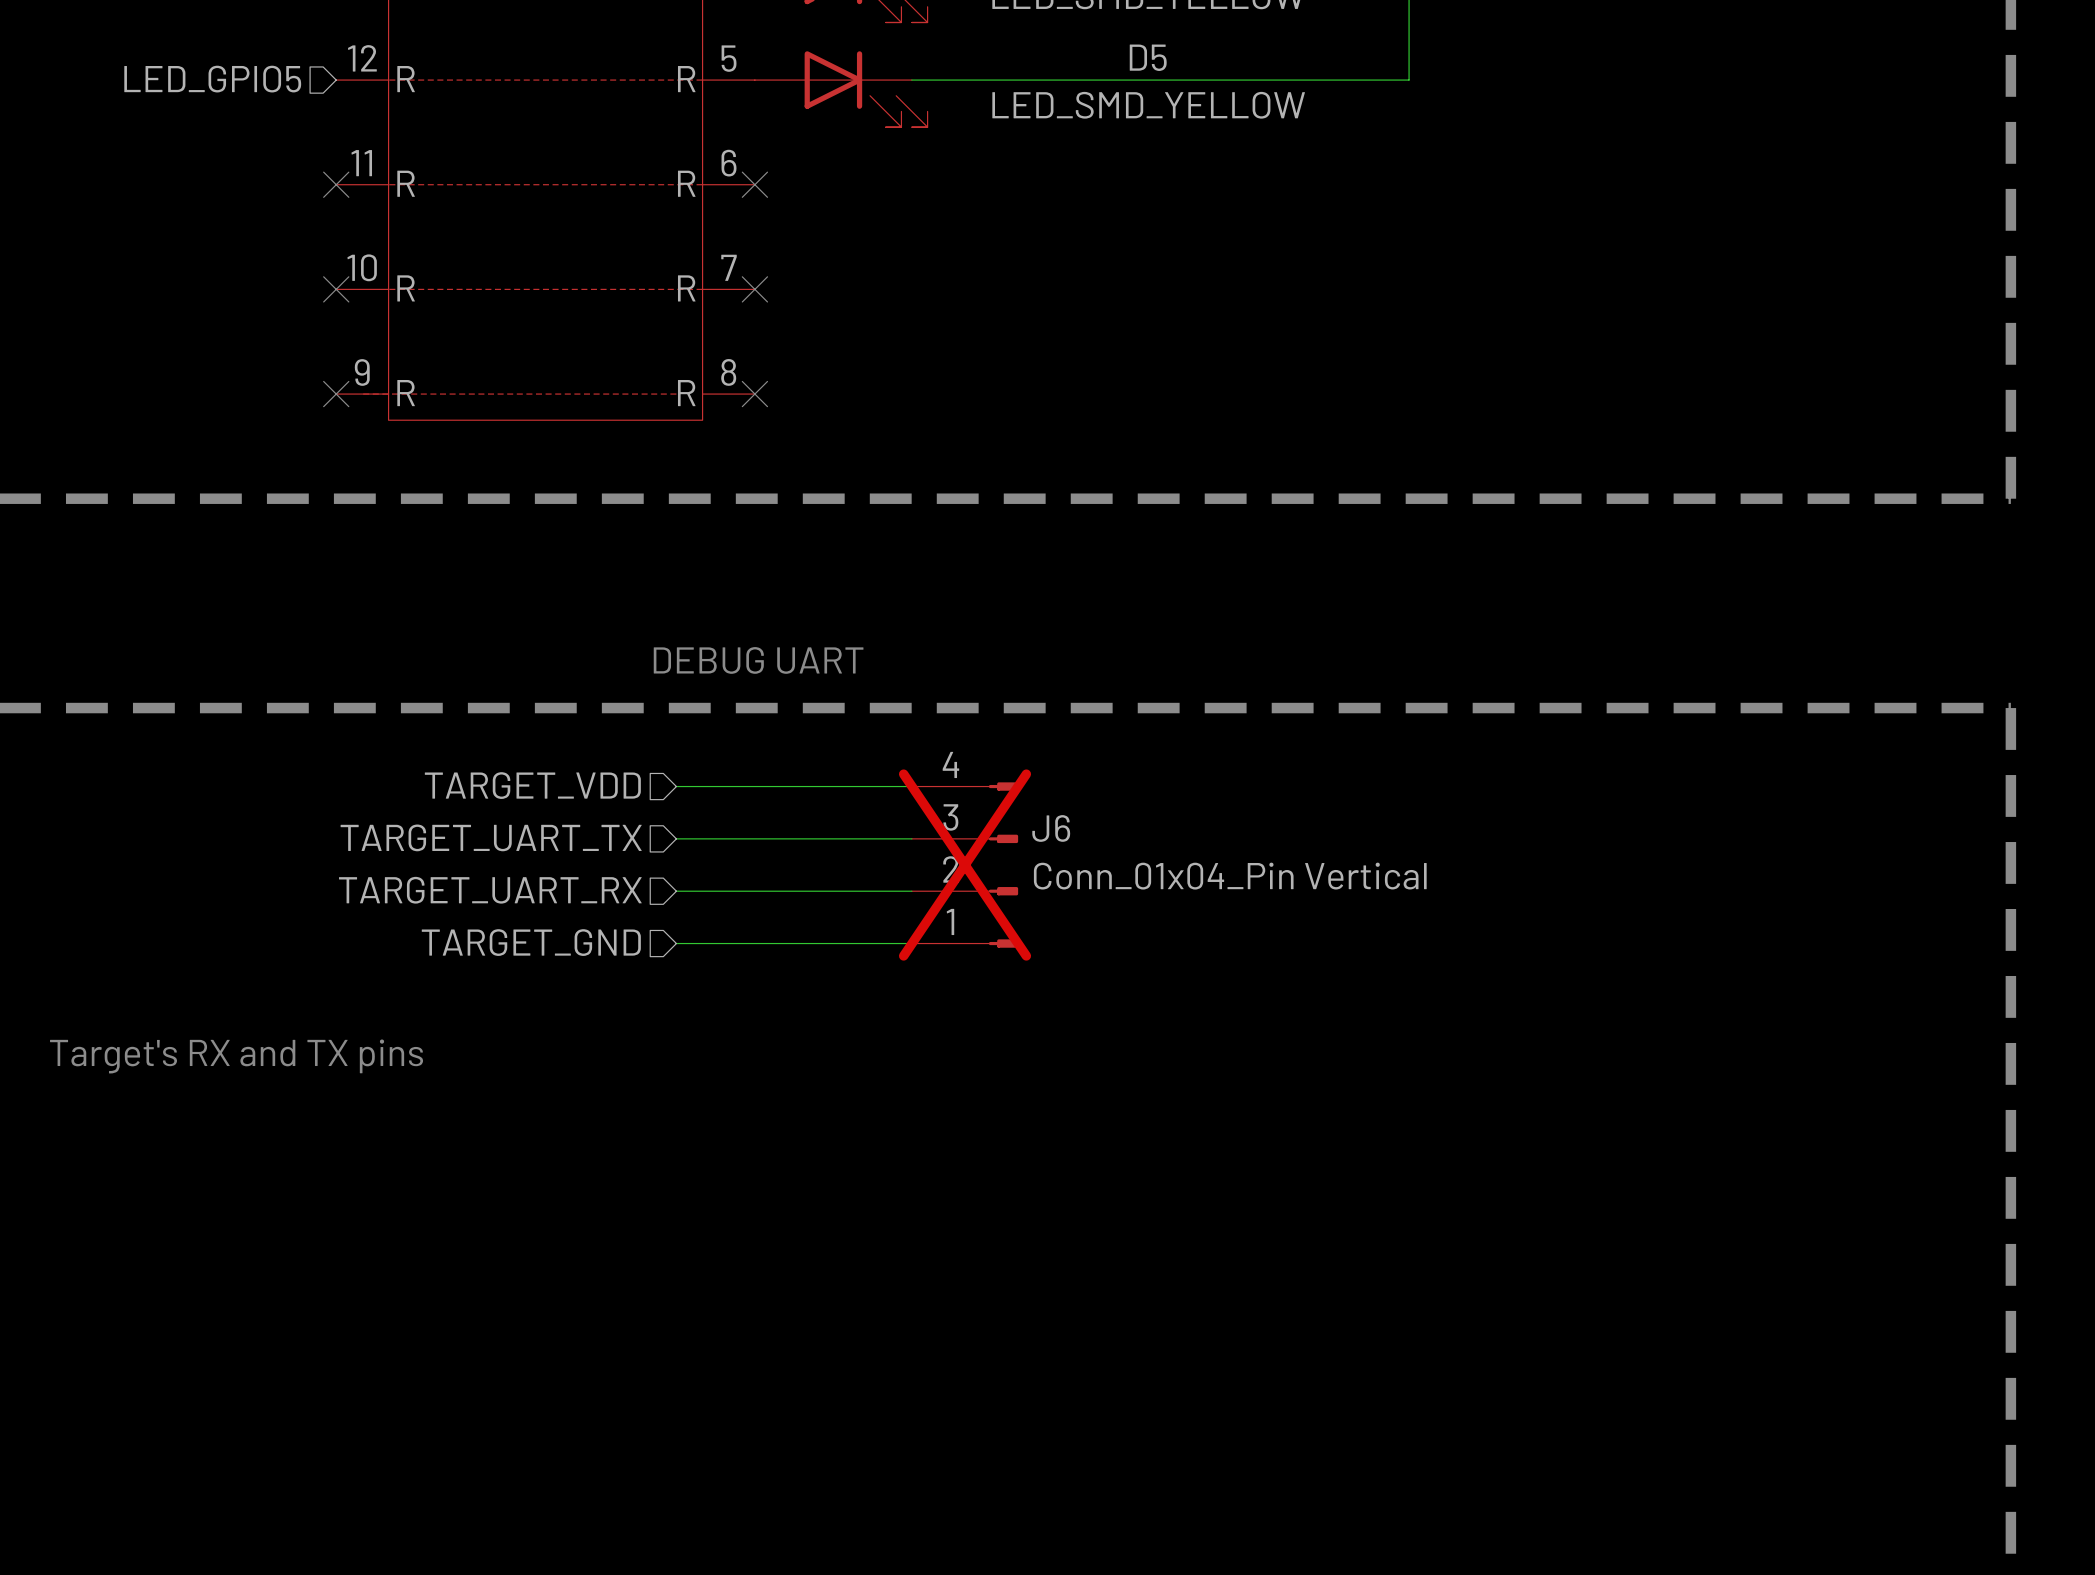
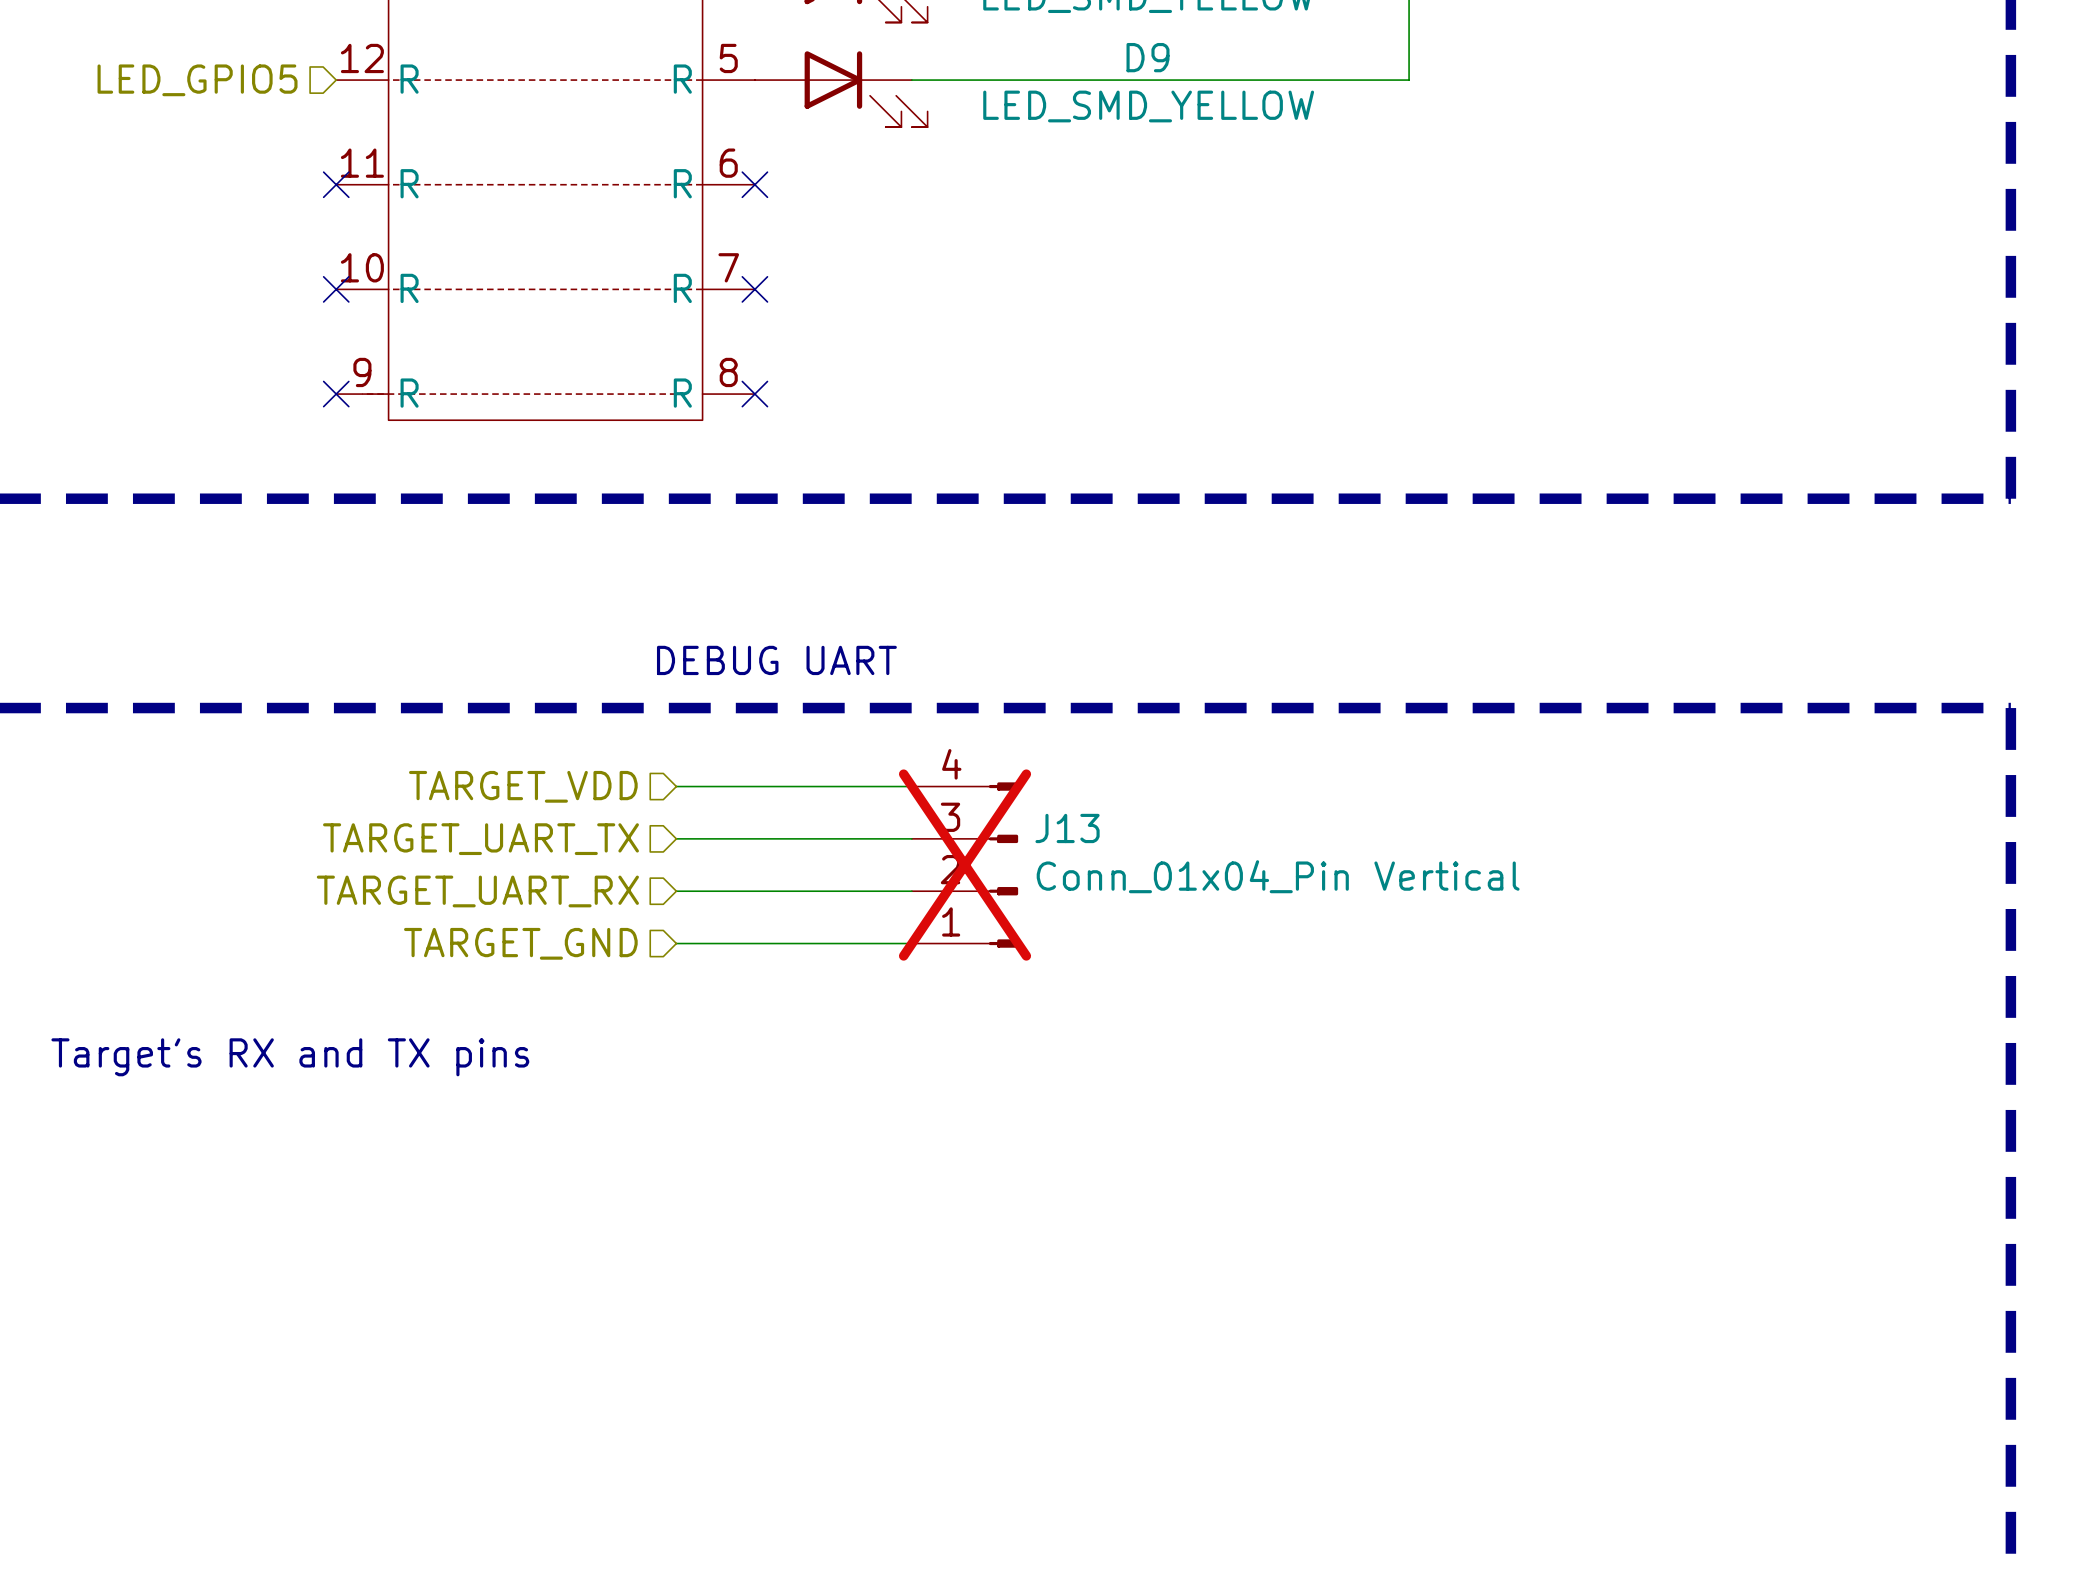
D5 name: D5 (1148, 57) -> D9 (1148, 57)
J6 name: J6 (1051, 828) -> J13 (1067, 828)

